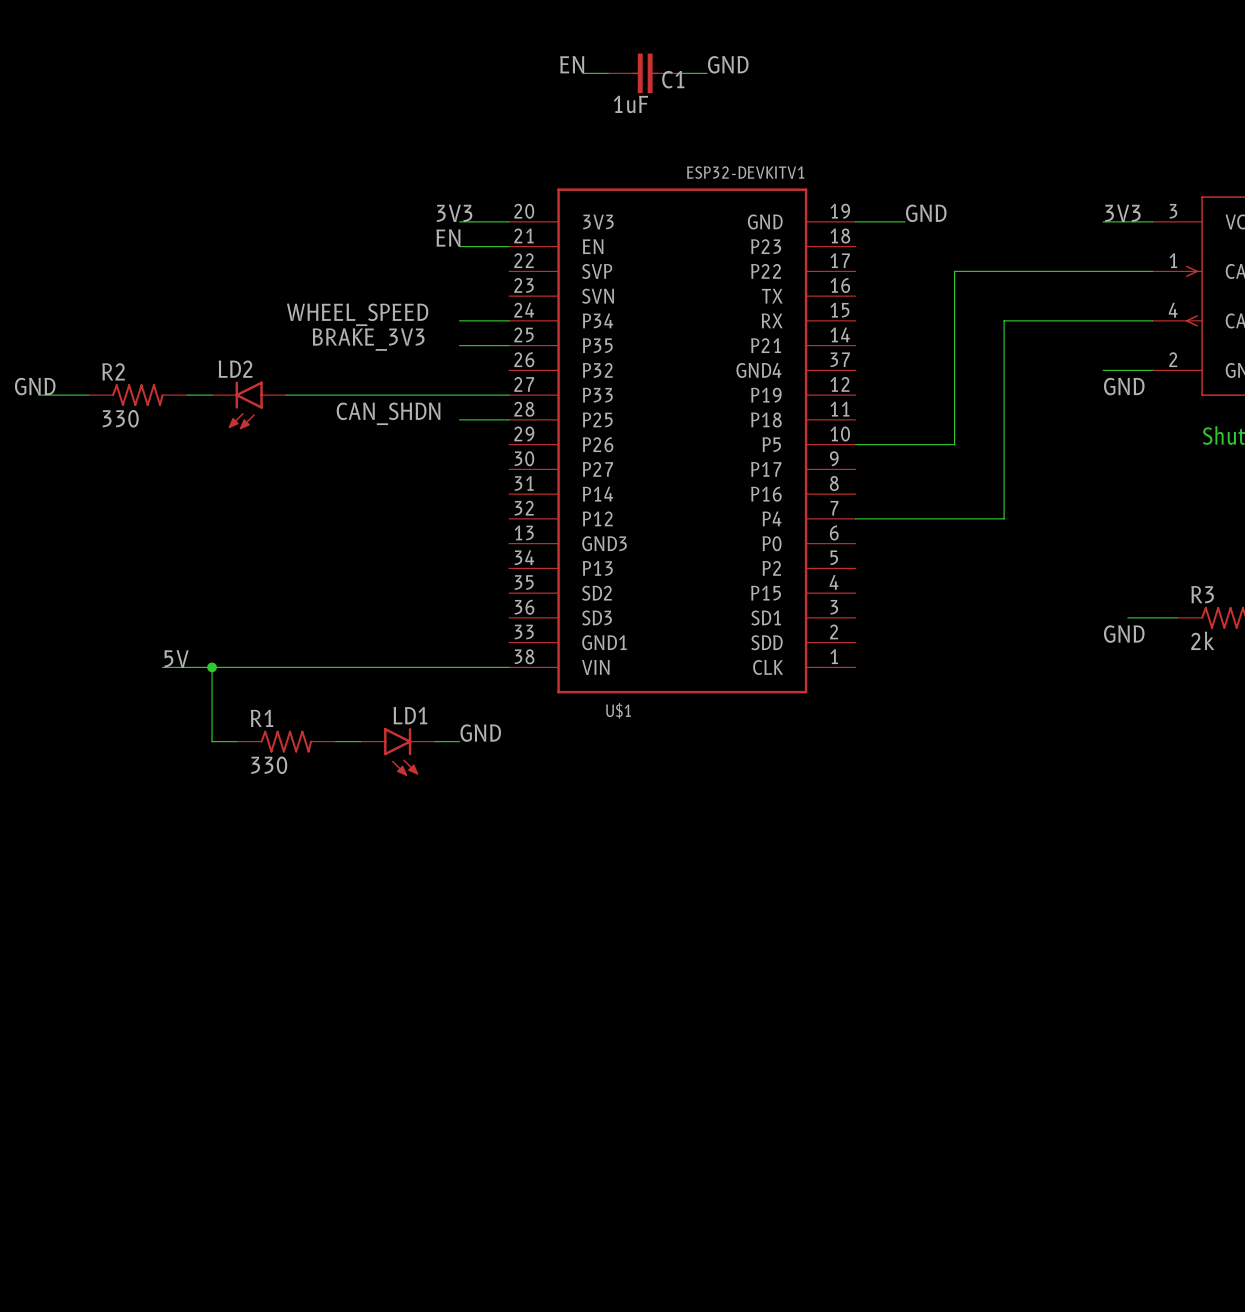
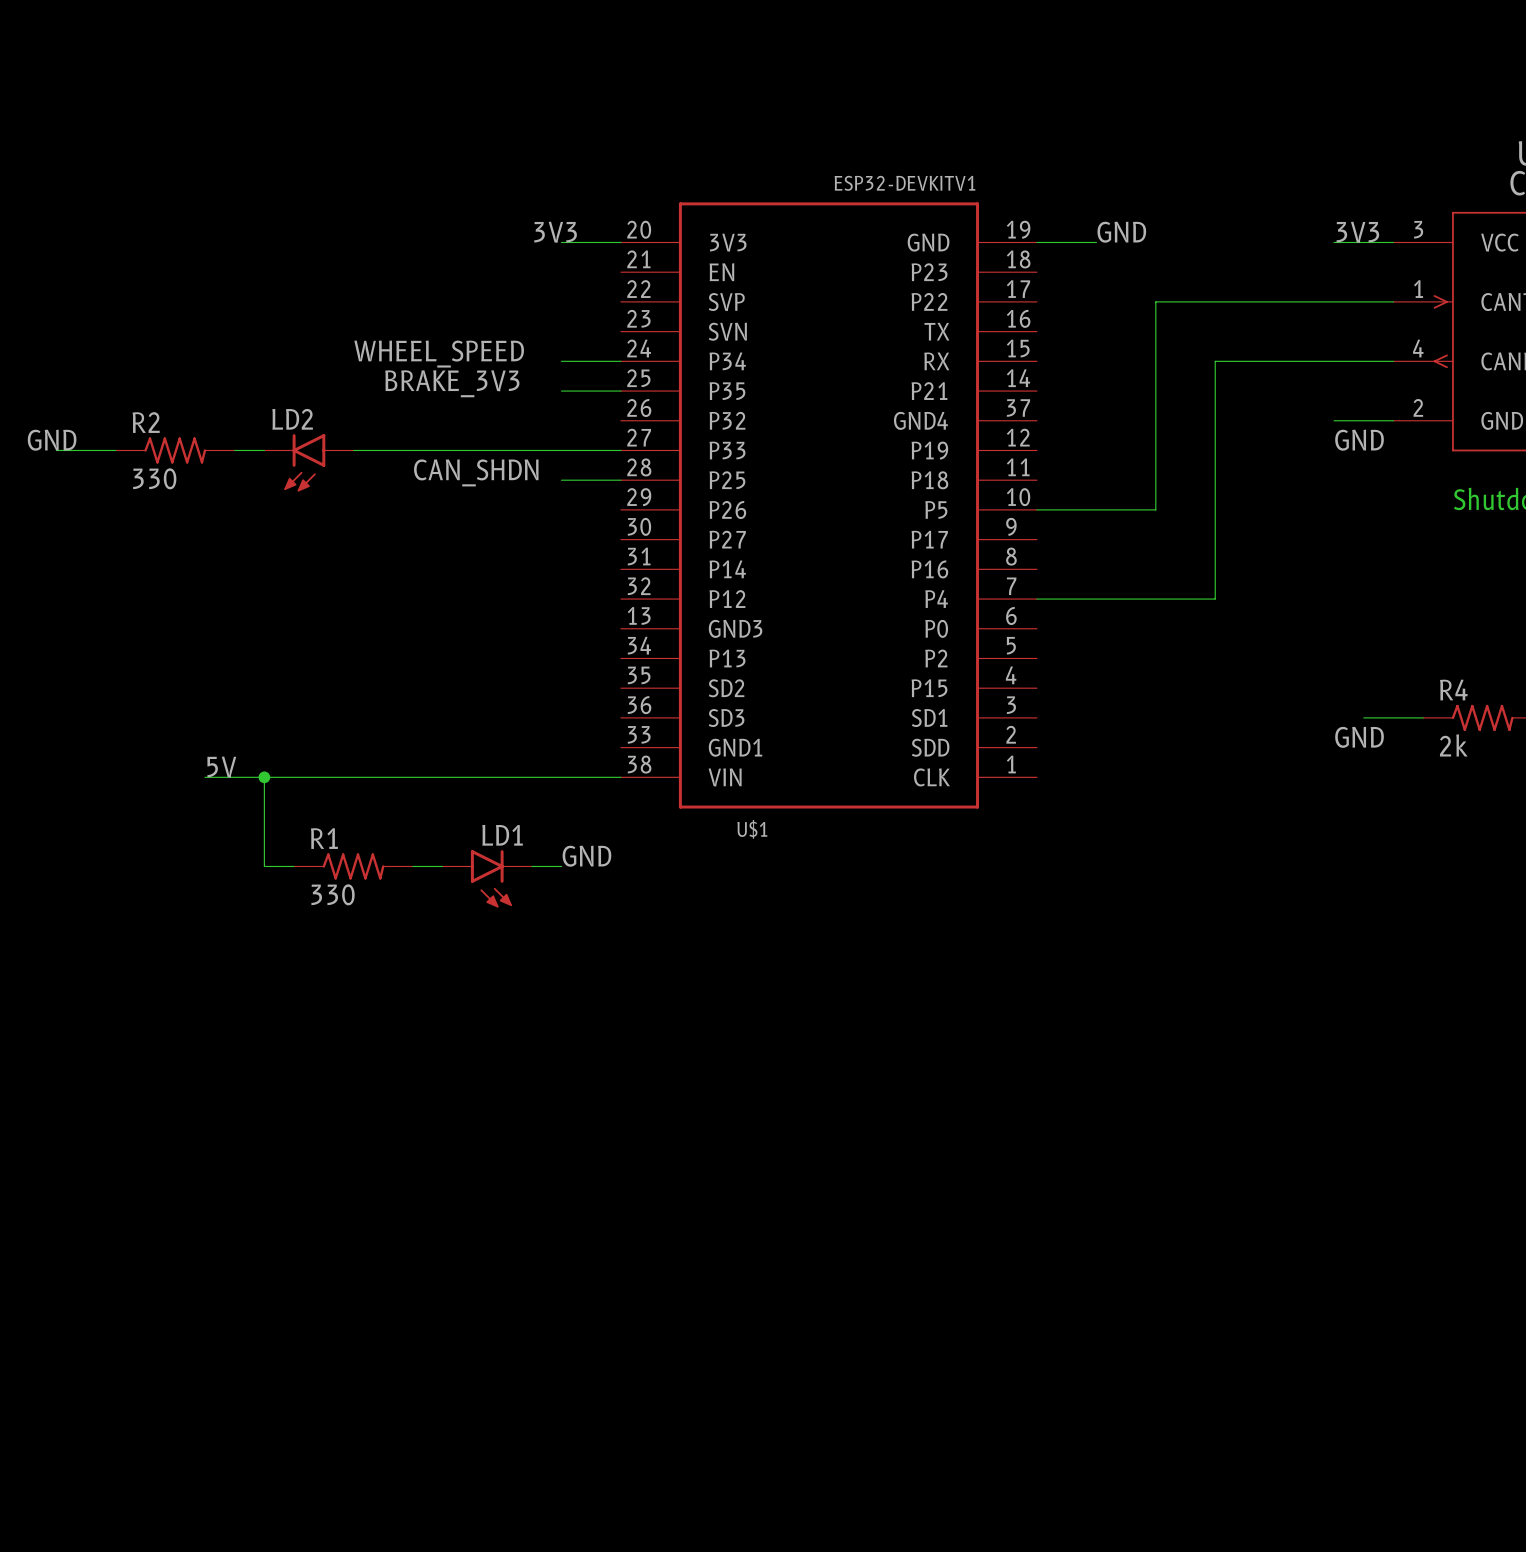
label: EN (572, 64) -> none
label: GND (728, 64) -> none
wire: (583, 73) (608, 73) -> none
C1: 1uF (645, 73) -> none
wire: (682, 73) (707, 73) -> none
label: EN (448, 237) -> none
wire: (459, 246) (509, 246) -> none
R3 name: R3 (1202, 594) -> R4 (1453, 689)

